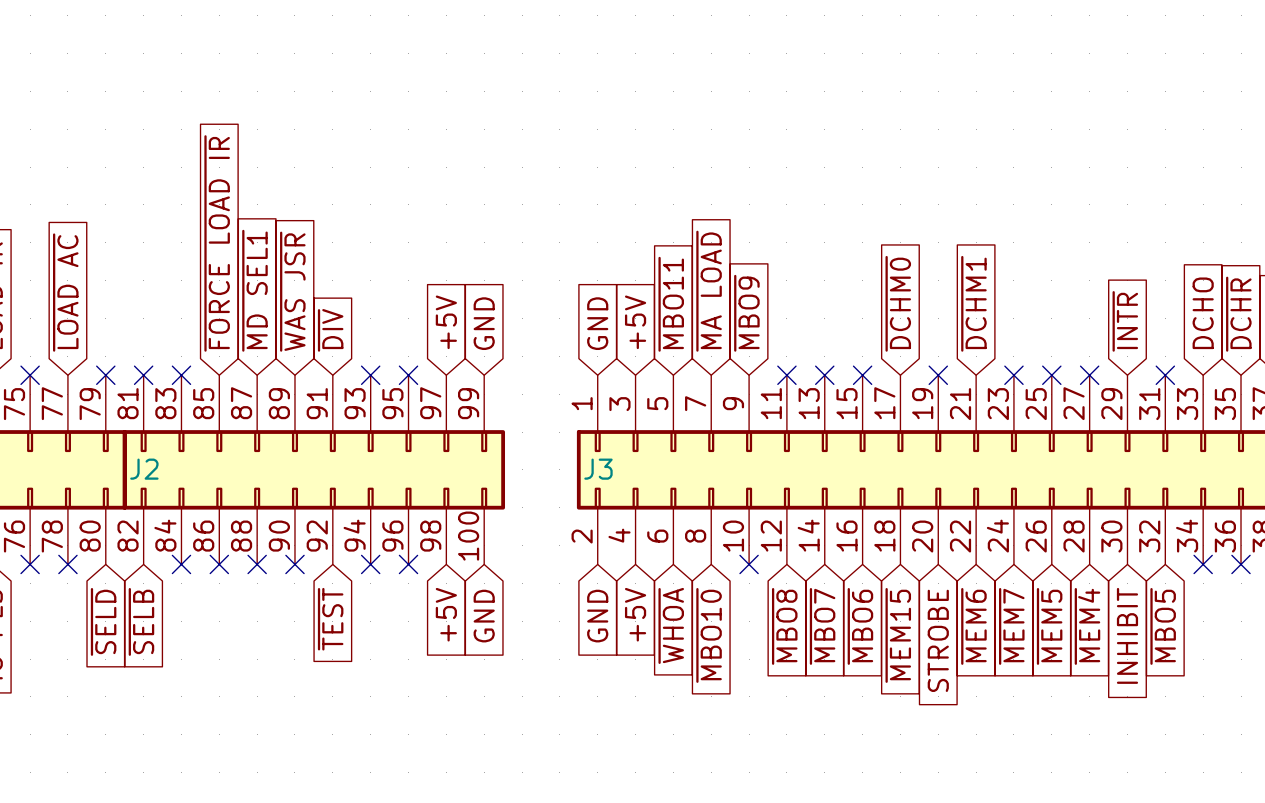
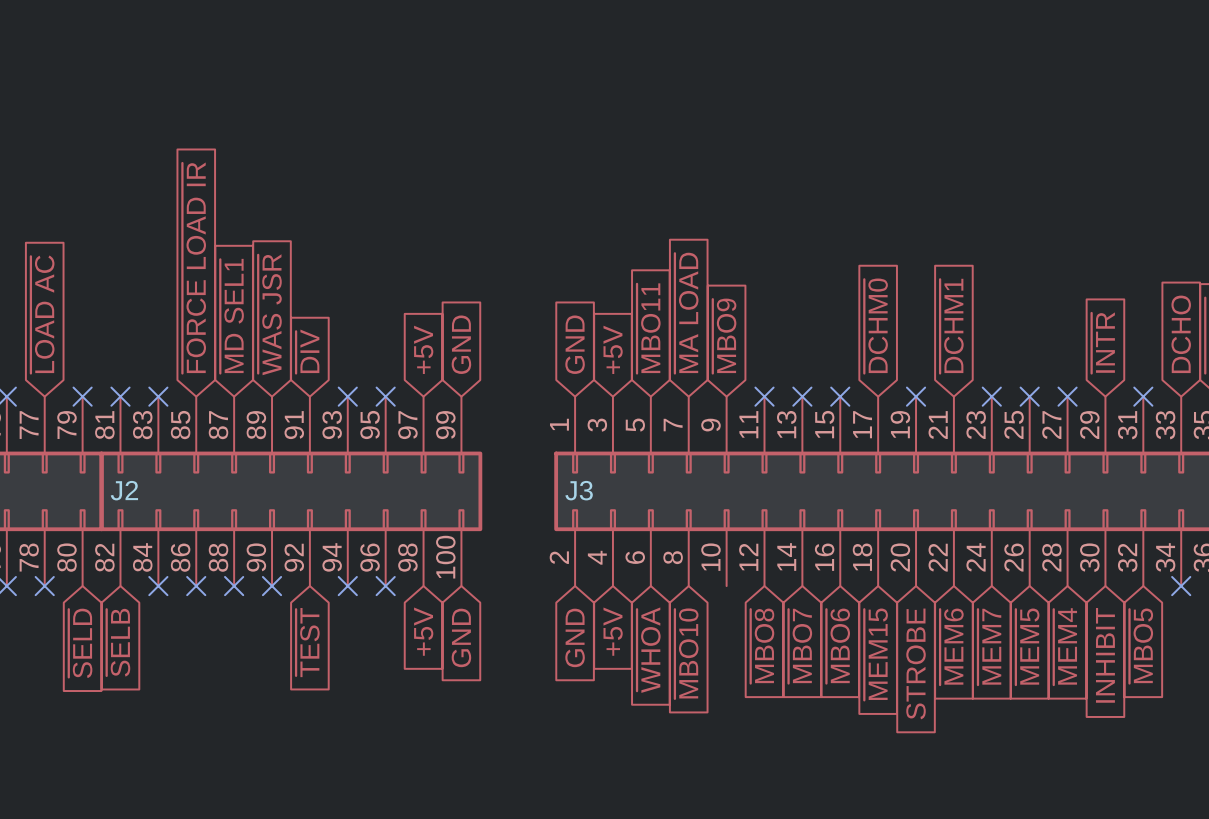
no-connect mark: (749, 564) -> none

